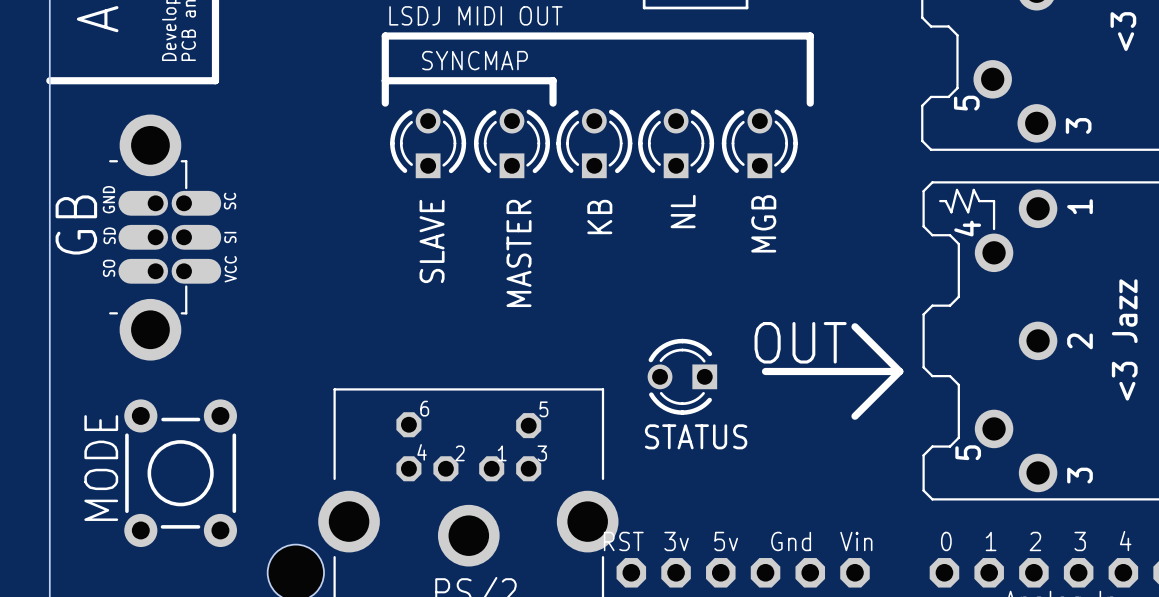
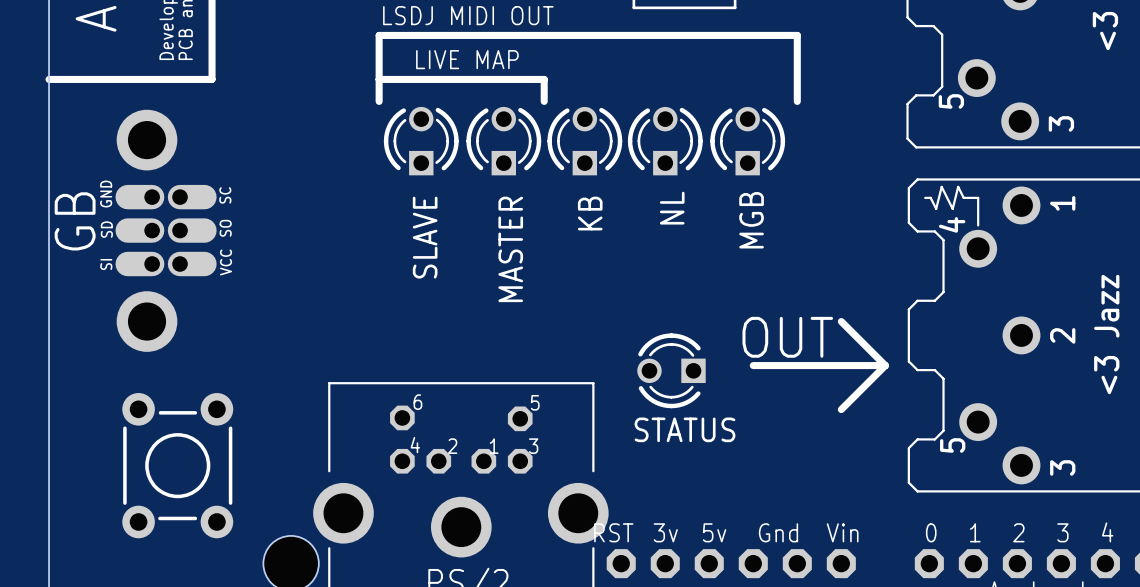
text: SYNCMAP (475, 60) -> LIVE MAP (467, 59)
part footprint: [109, 114, 222, 361] -> [115, 109, 217, 352]
text: MODE (101, 468) -> none

